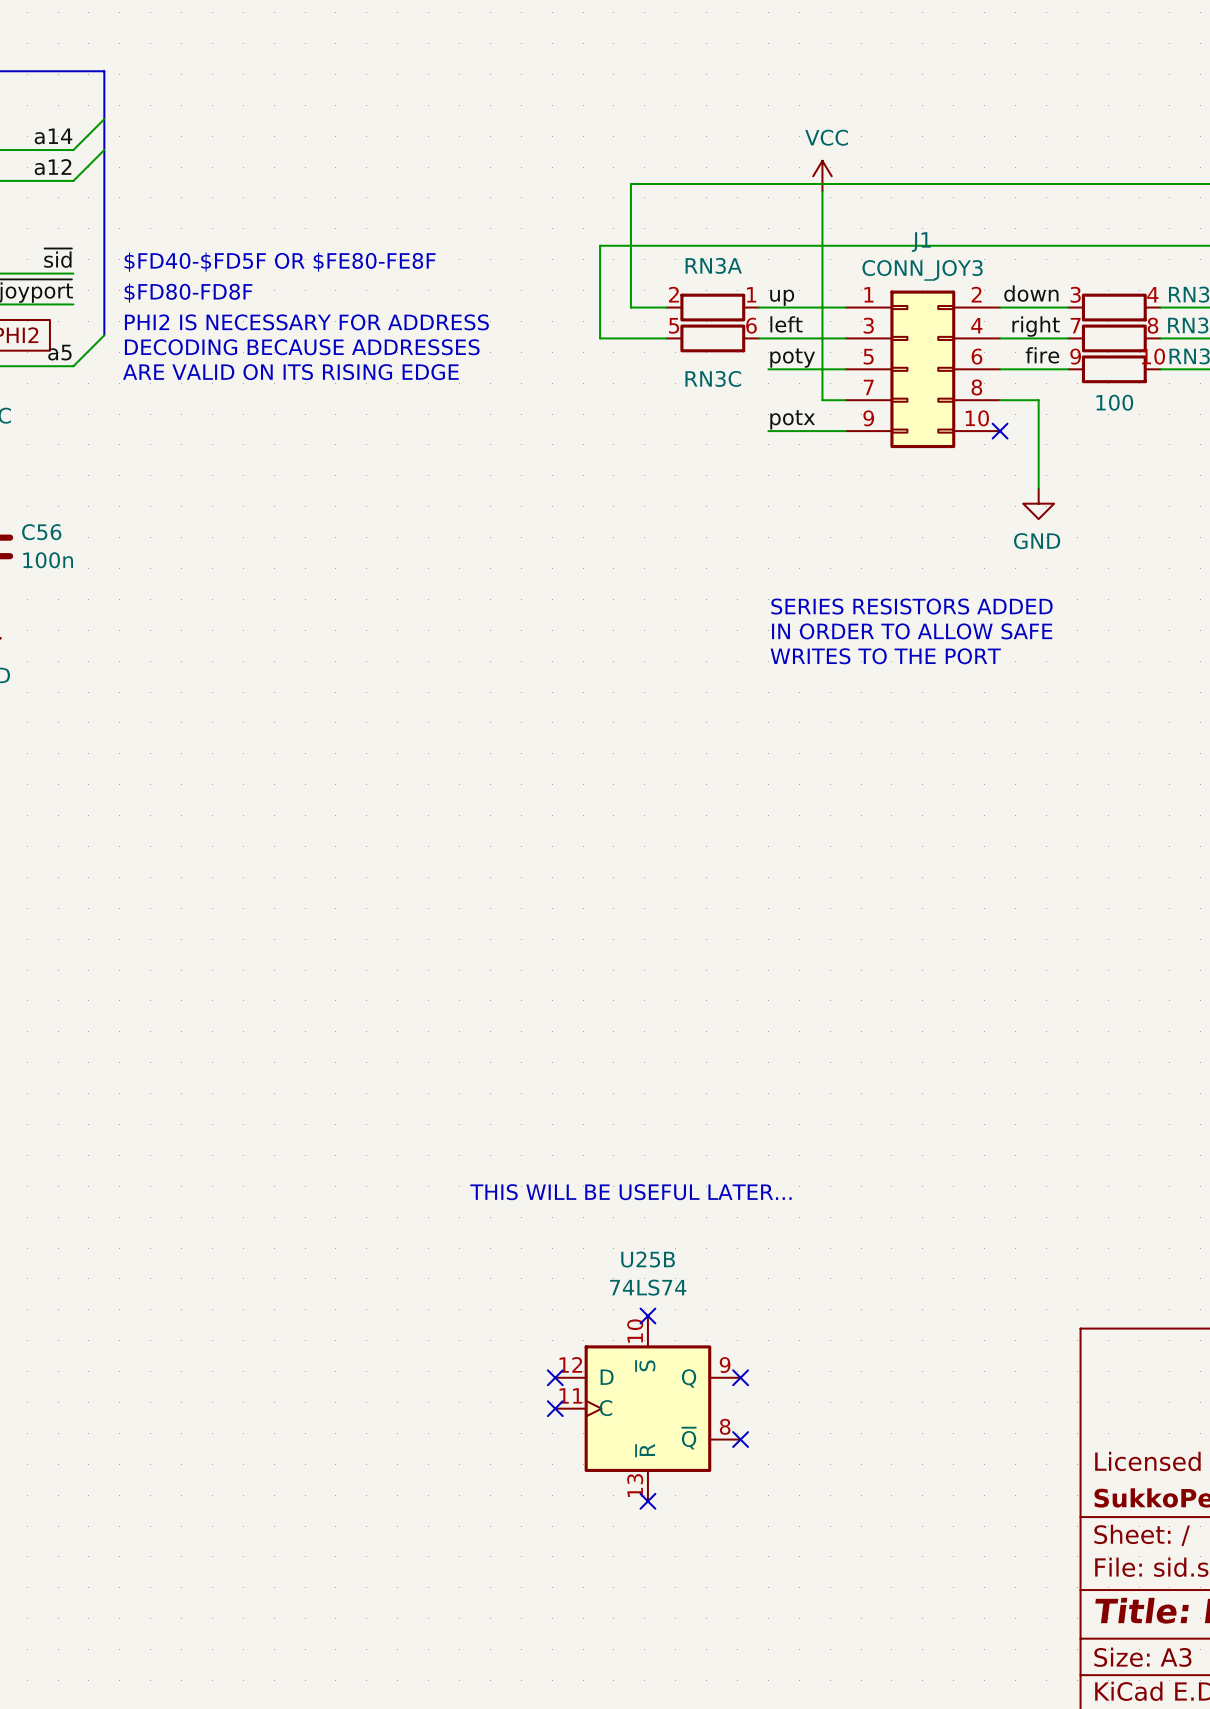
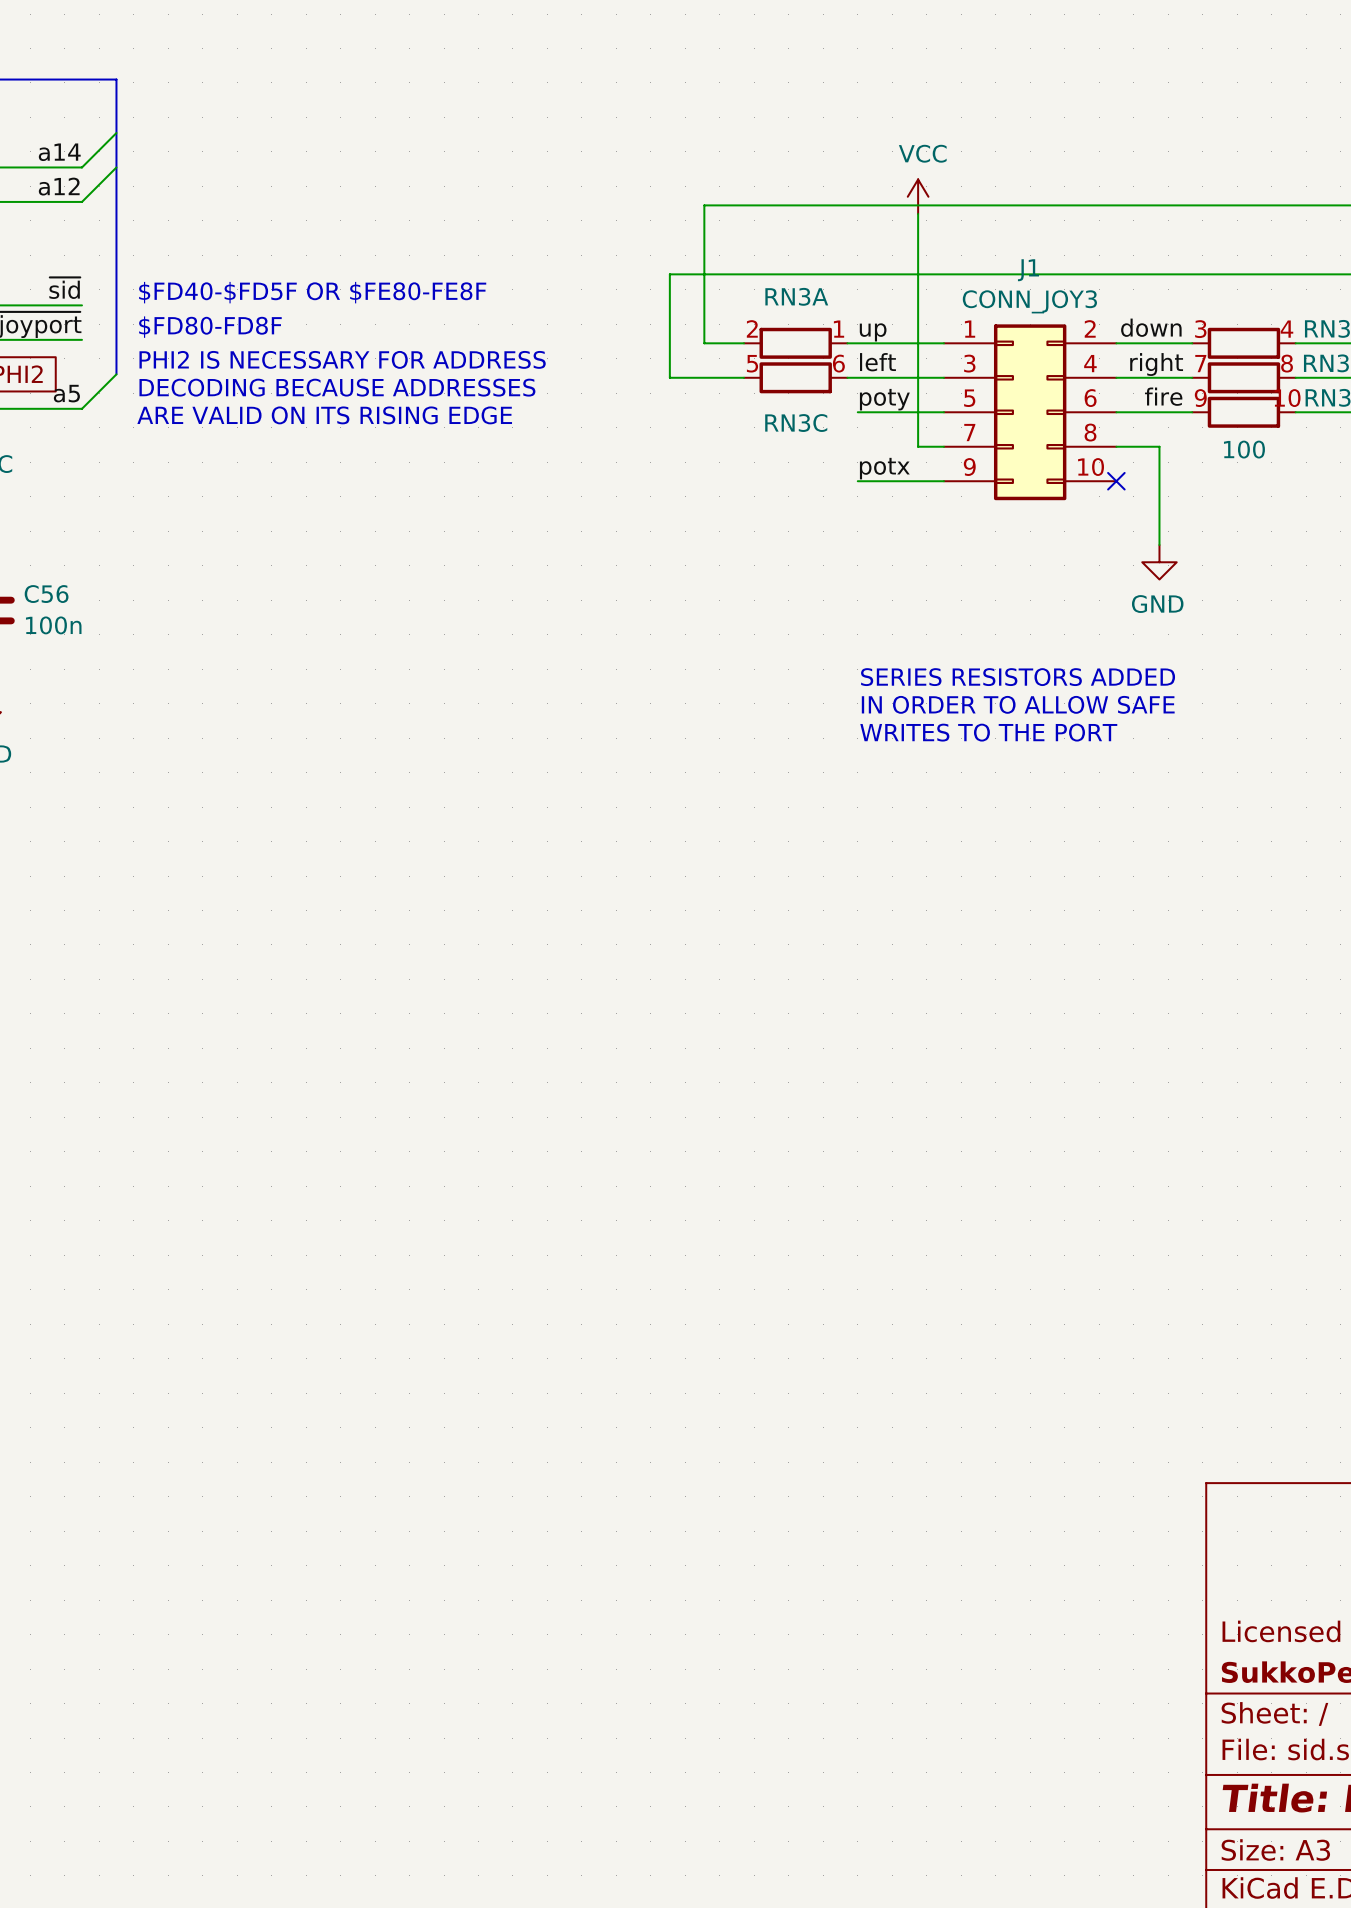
text: THIS WILL BE USEFUL LATER... (630, 1192) -> none
no-connect mark: (647, 1316) -> none
no-connect mark: (555, 1377) -> none
no-connect mark: (740, 1377) -> none
no-connect mark: (555, 1408) -> none
U25B: 74LS74 (647, 1408) -> none
no-connect mark: (740, 1439) -> none
no-connect mark: (647, 1501) -> none

